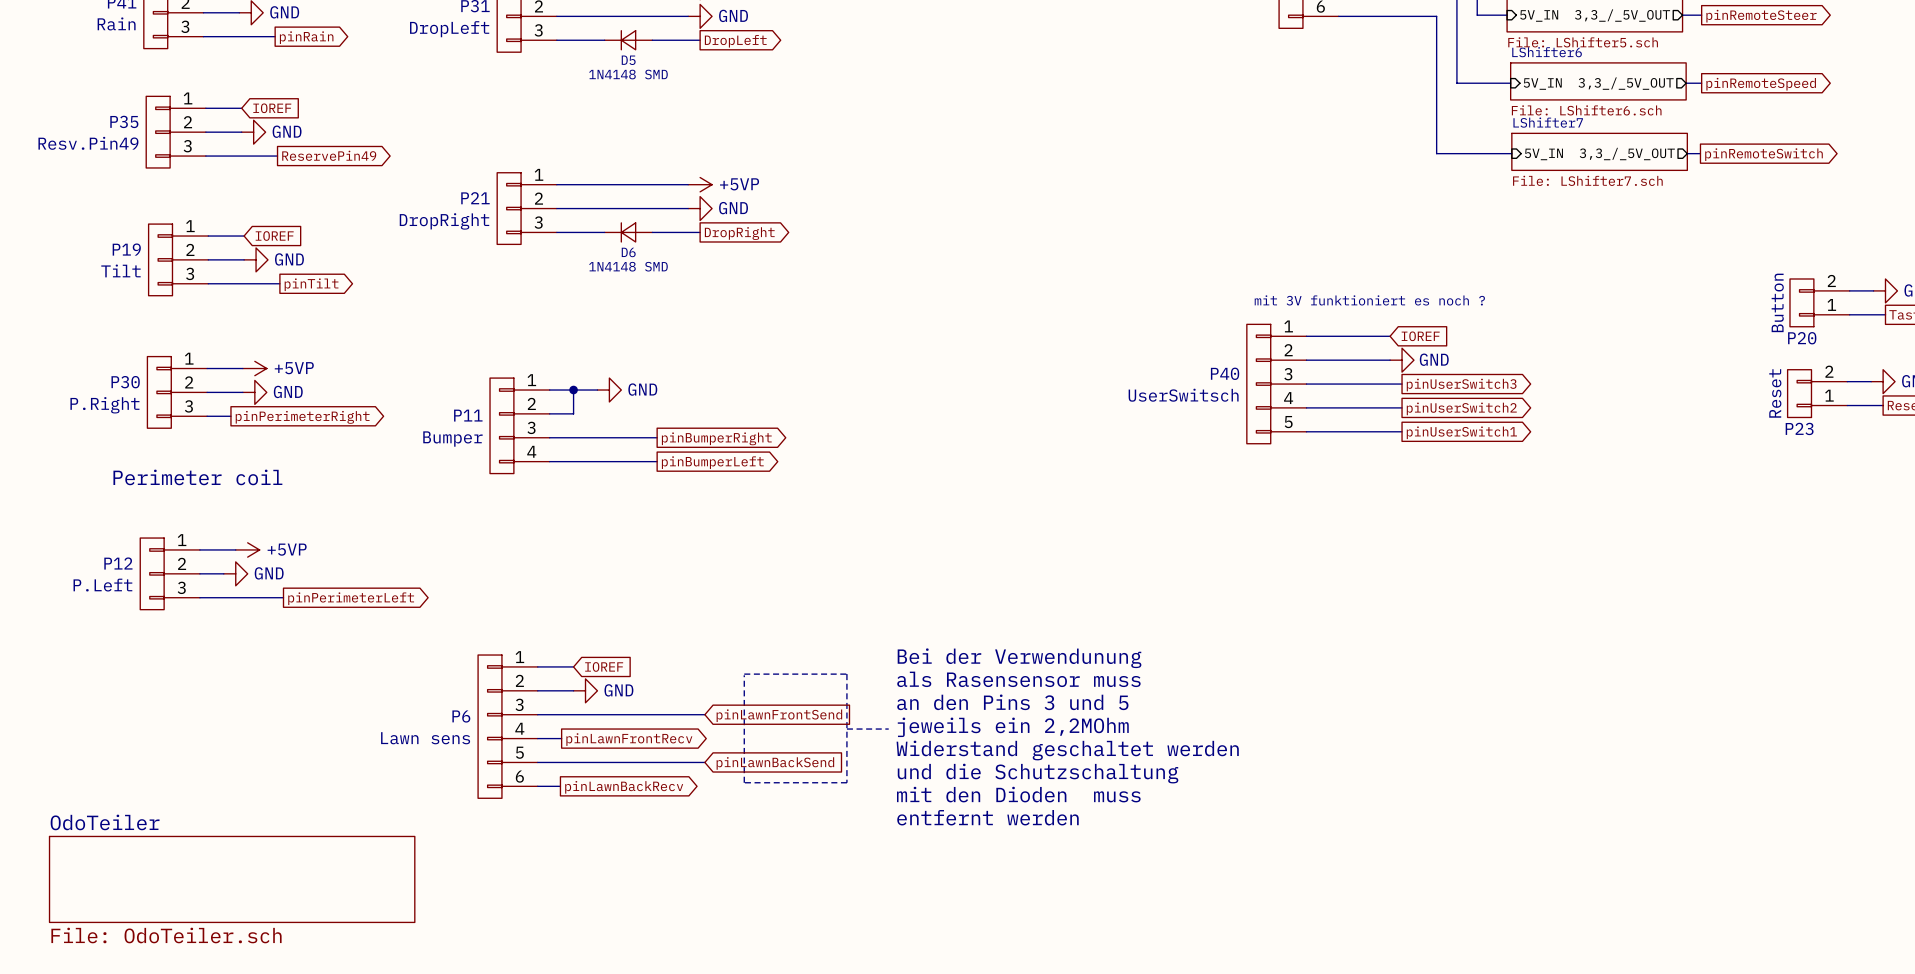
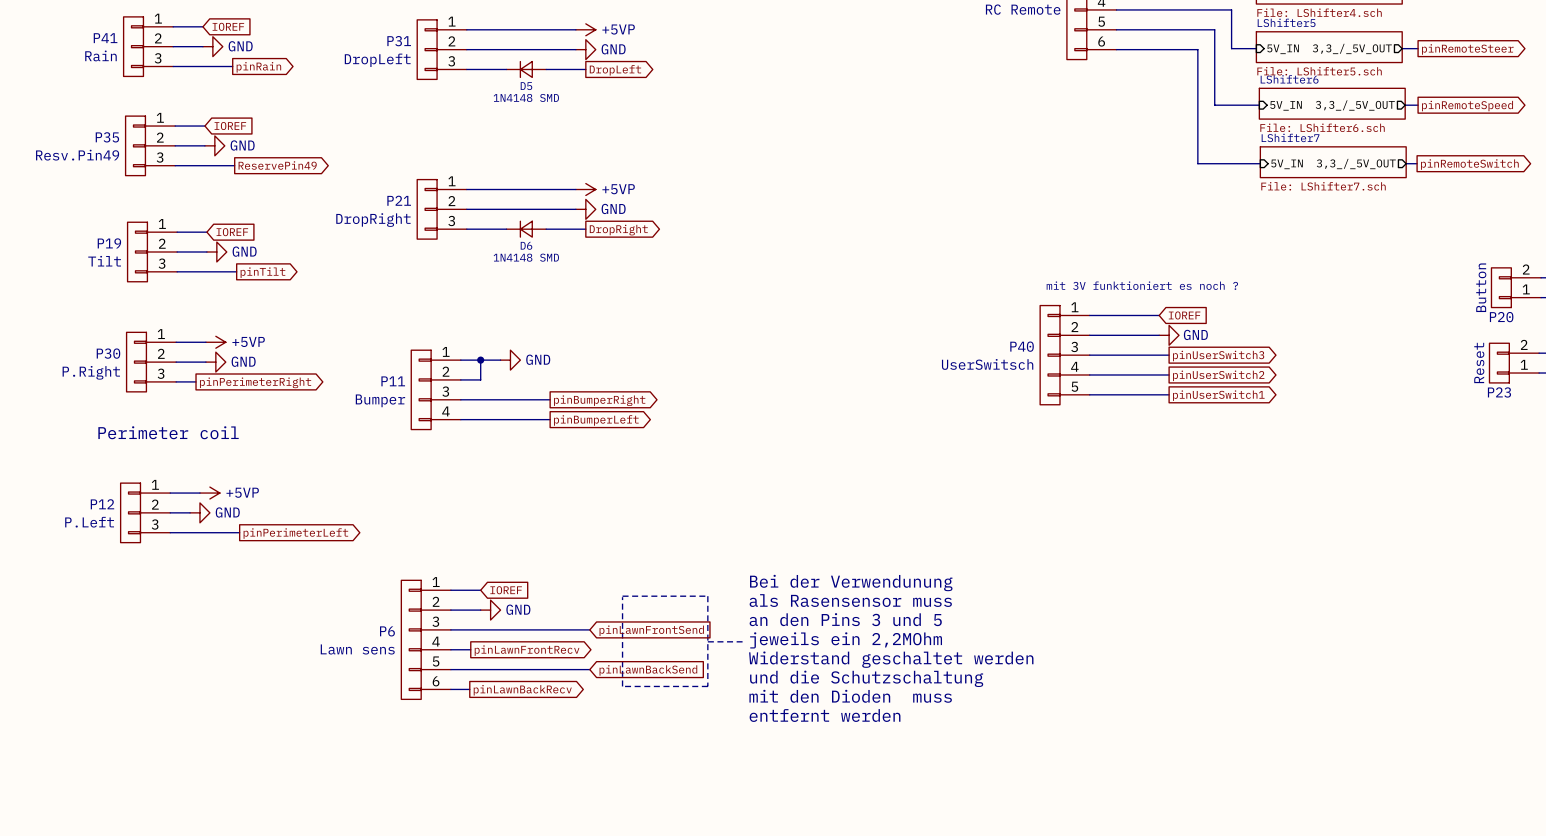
sheet OdoTeiler: File: OdoTeiler.sch (232, 879) -> none

